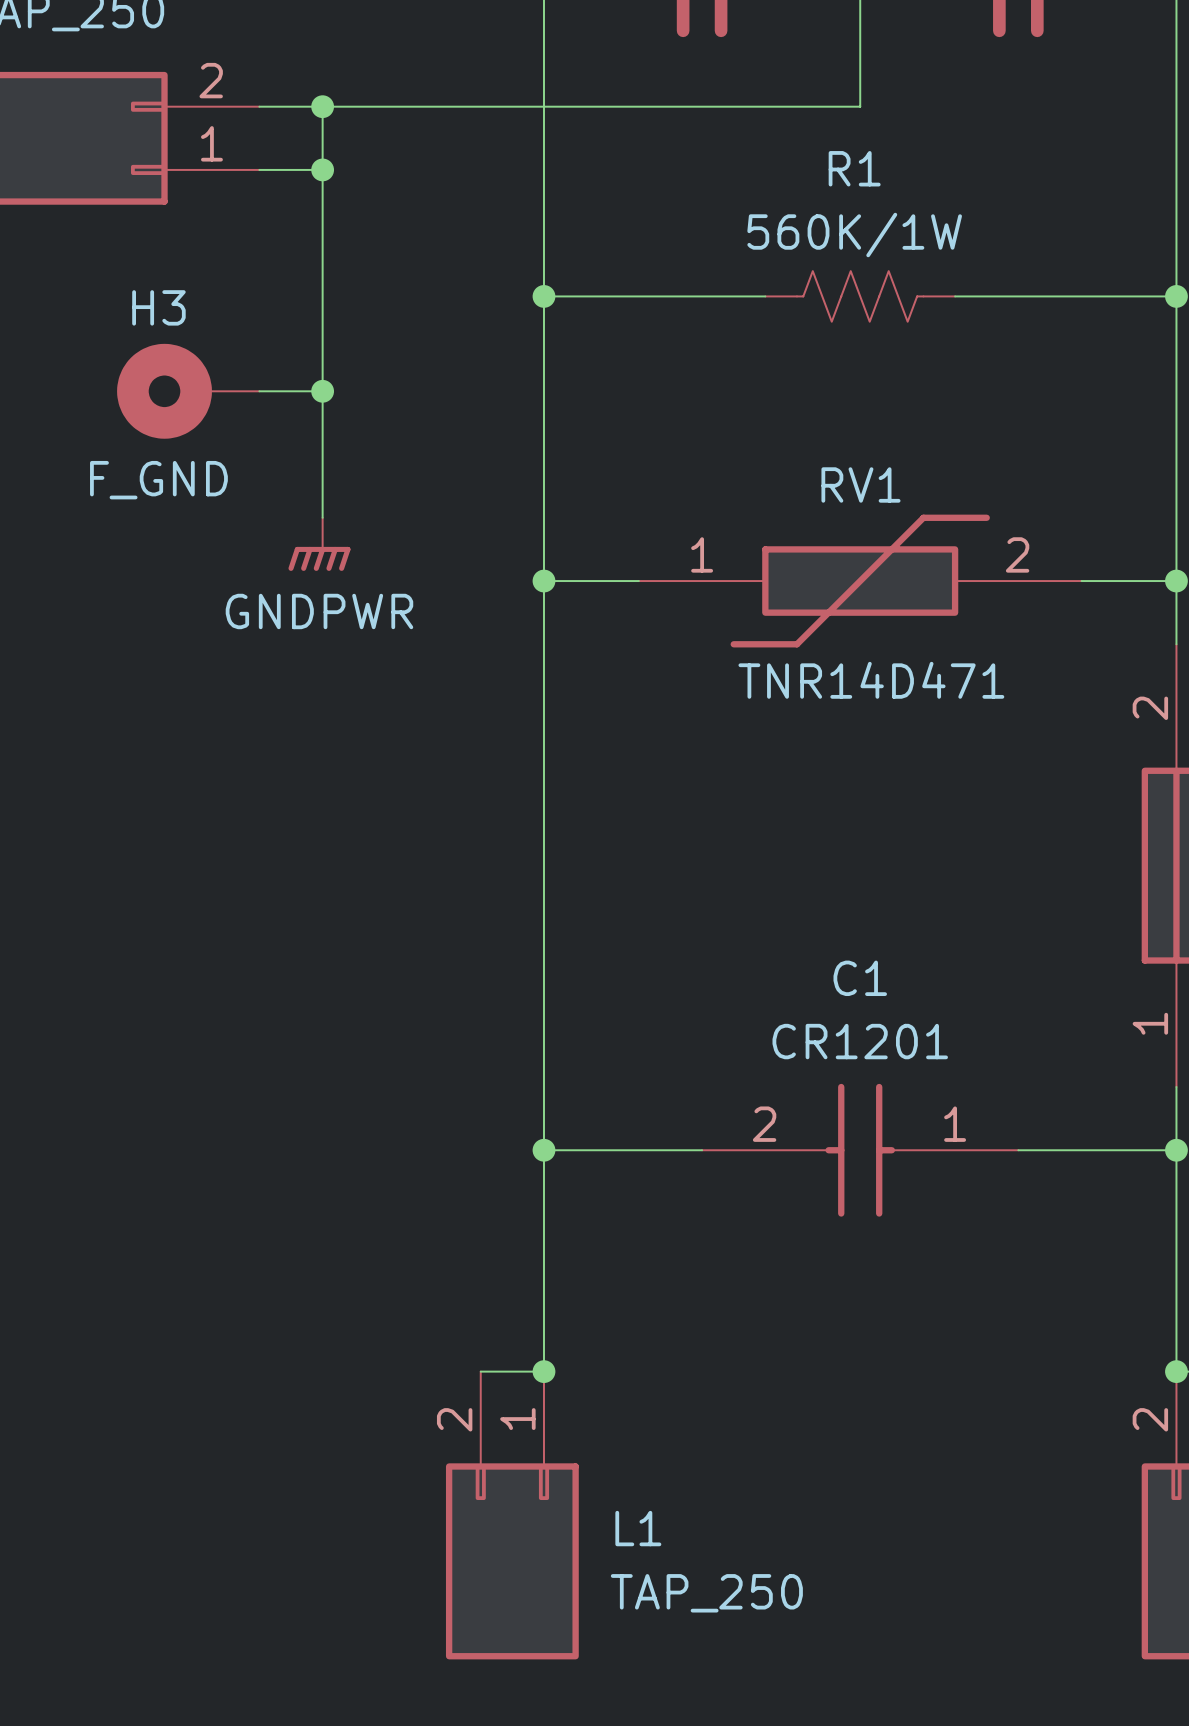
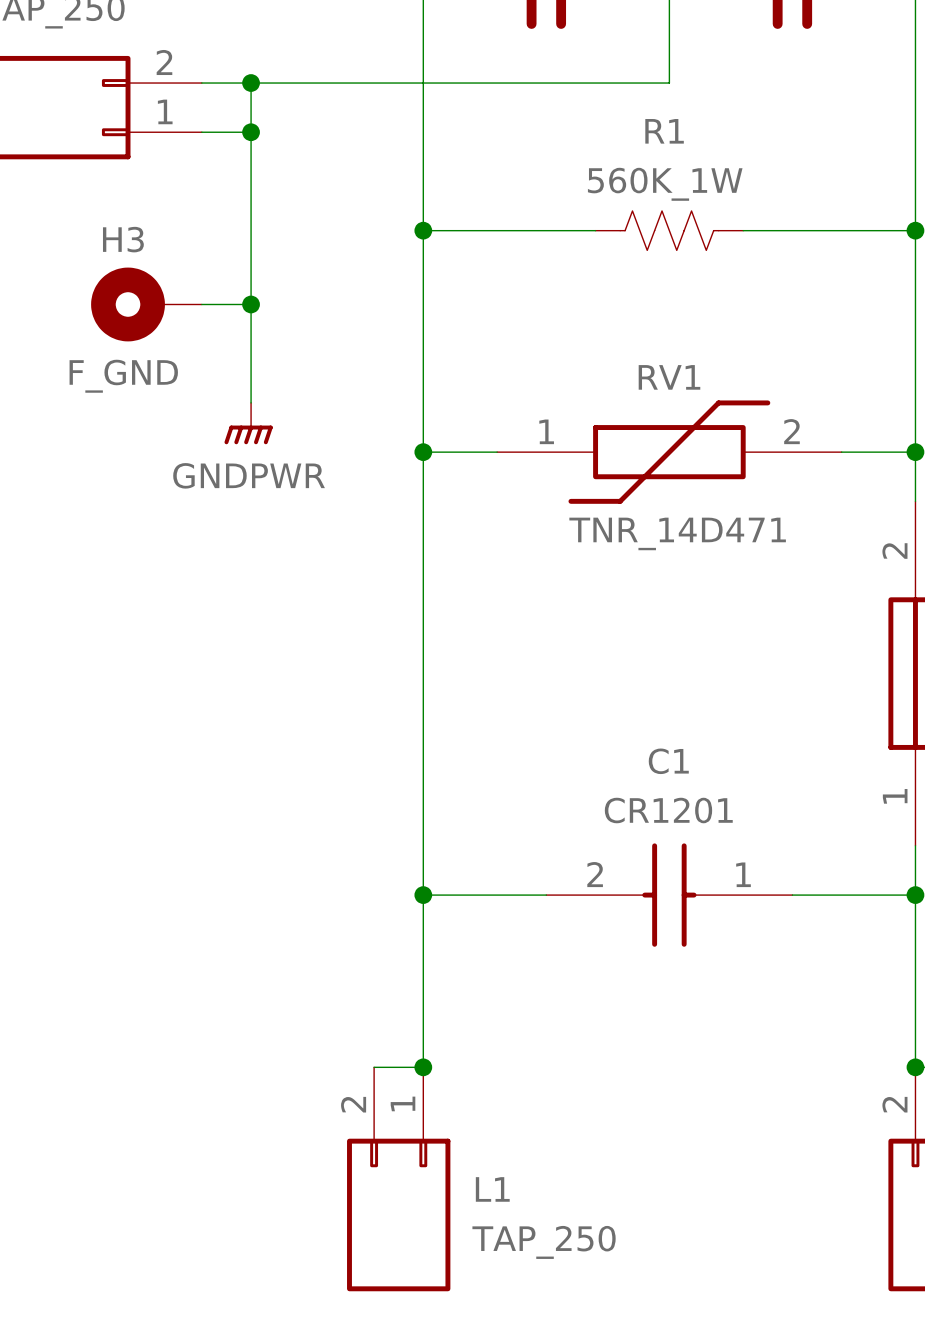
R1 value: 560K/1W (854, 235) -> 560K_1W (665, 184)
RV1 value: TNR14D471 (871, 680) -> TNR_14D471 (677, 533)

